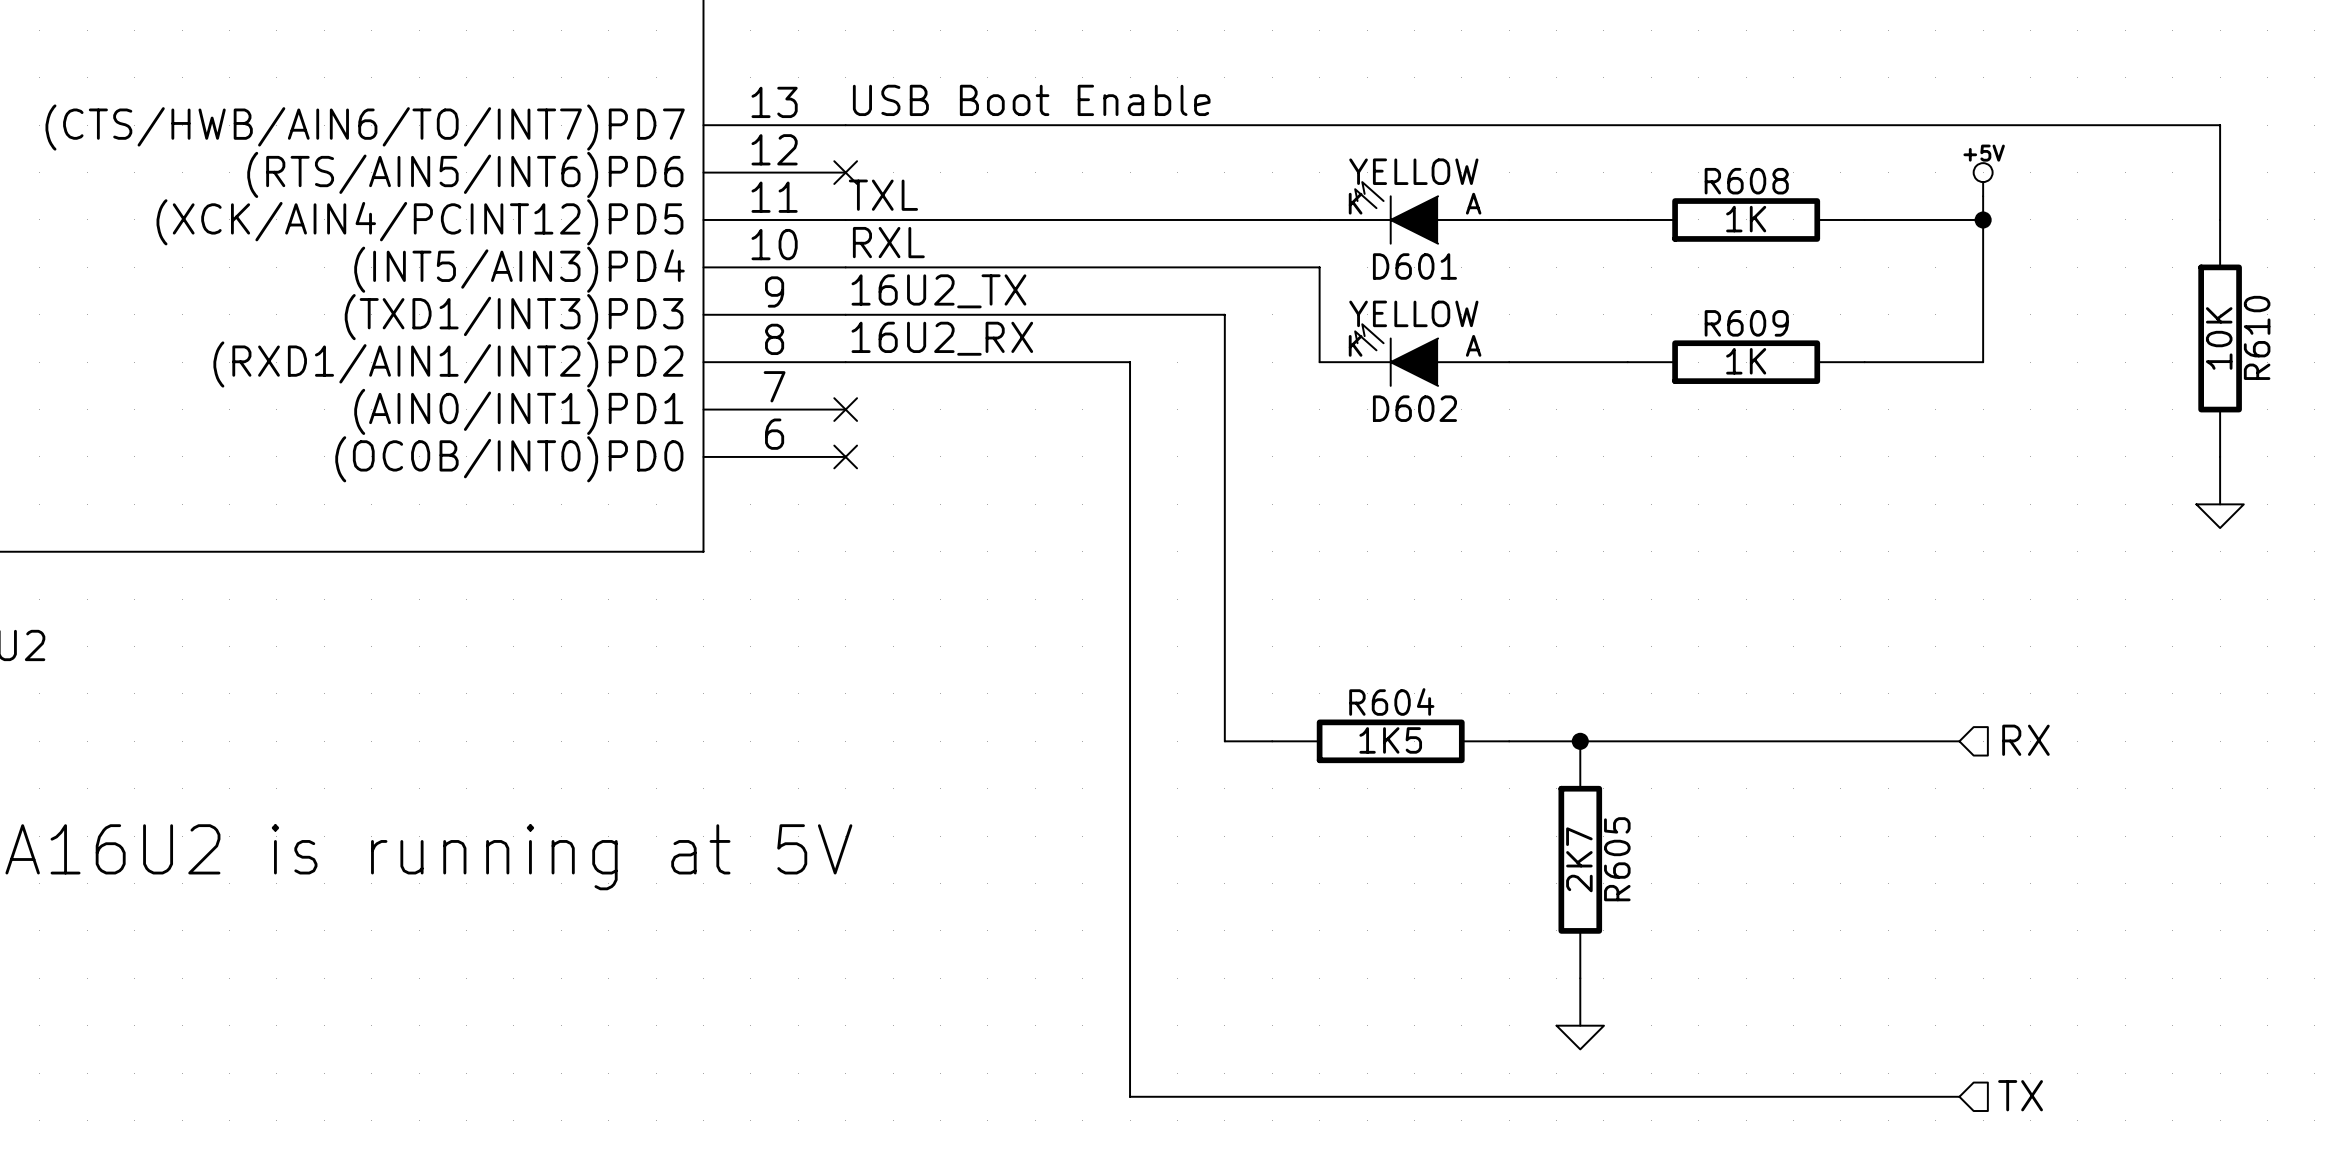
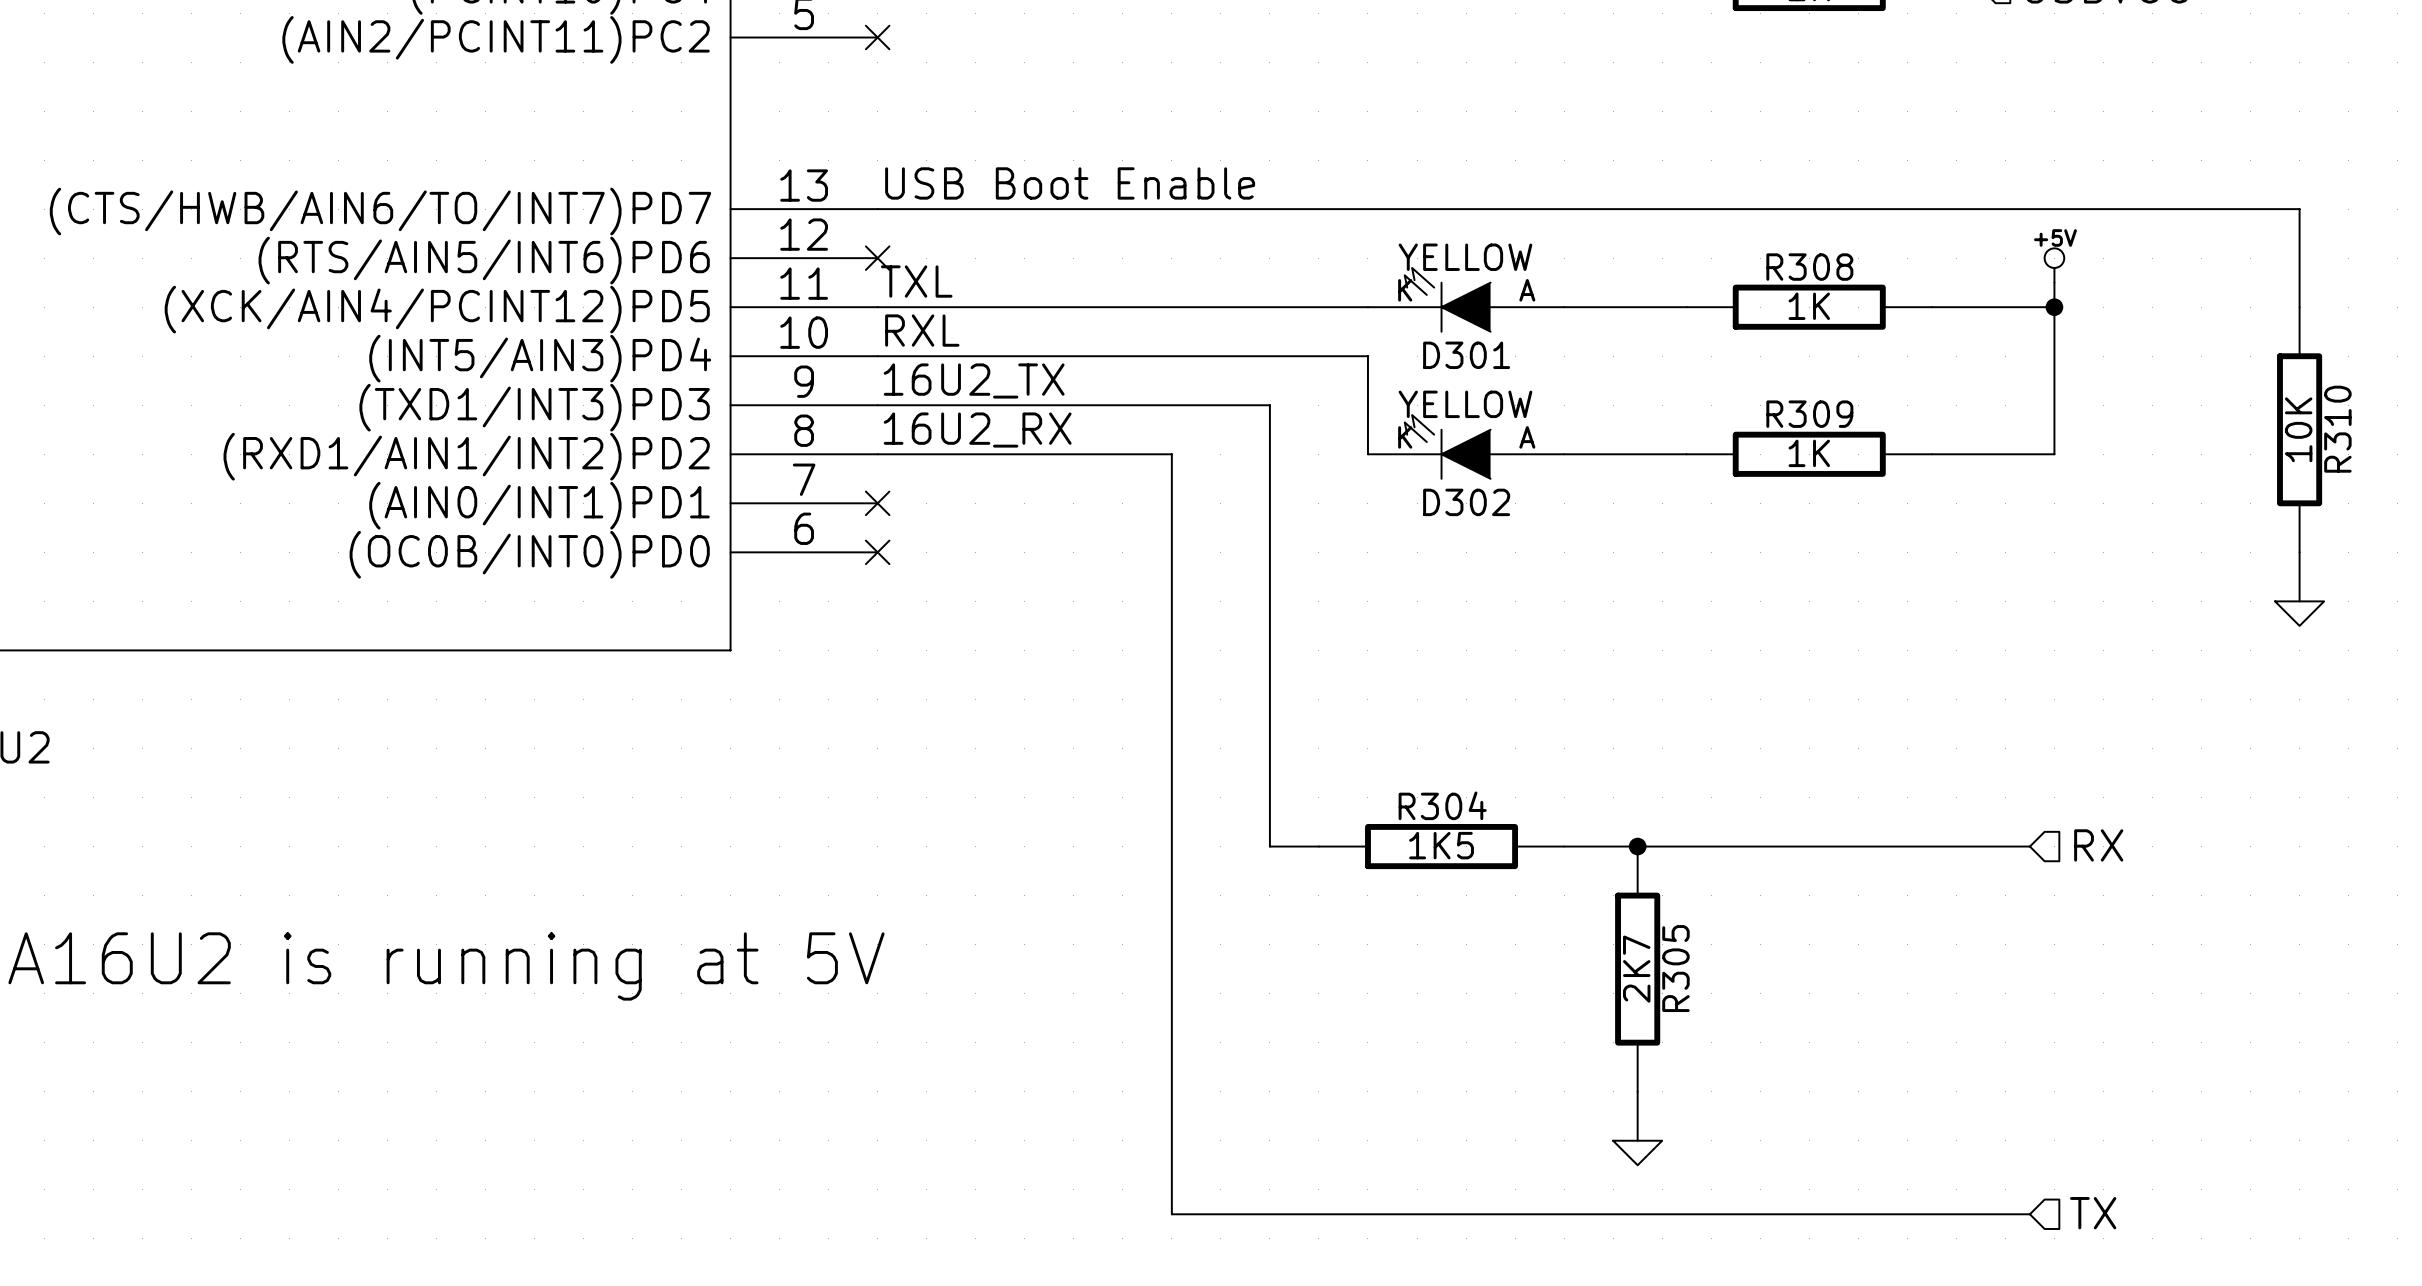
R608 name: R608 (1746, 181) -> R308 (1809, 267)
D601 name: D601 (1414, 266) -> D301 (1466, 355)
R609 name: R609 (1746, 323) -> R309 (1809, 414)
R610 name: R610 (2257, 337) -> R310 (2337, 429)
D602 name: D602 (1414, 408) -> D302 (1466, 502)
R604 name: R604 (1391, 701) -> R304 (1442, 805)
R605 name: R605 (1617, 859) -> R305 (1675, 968)

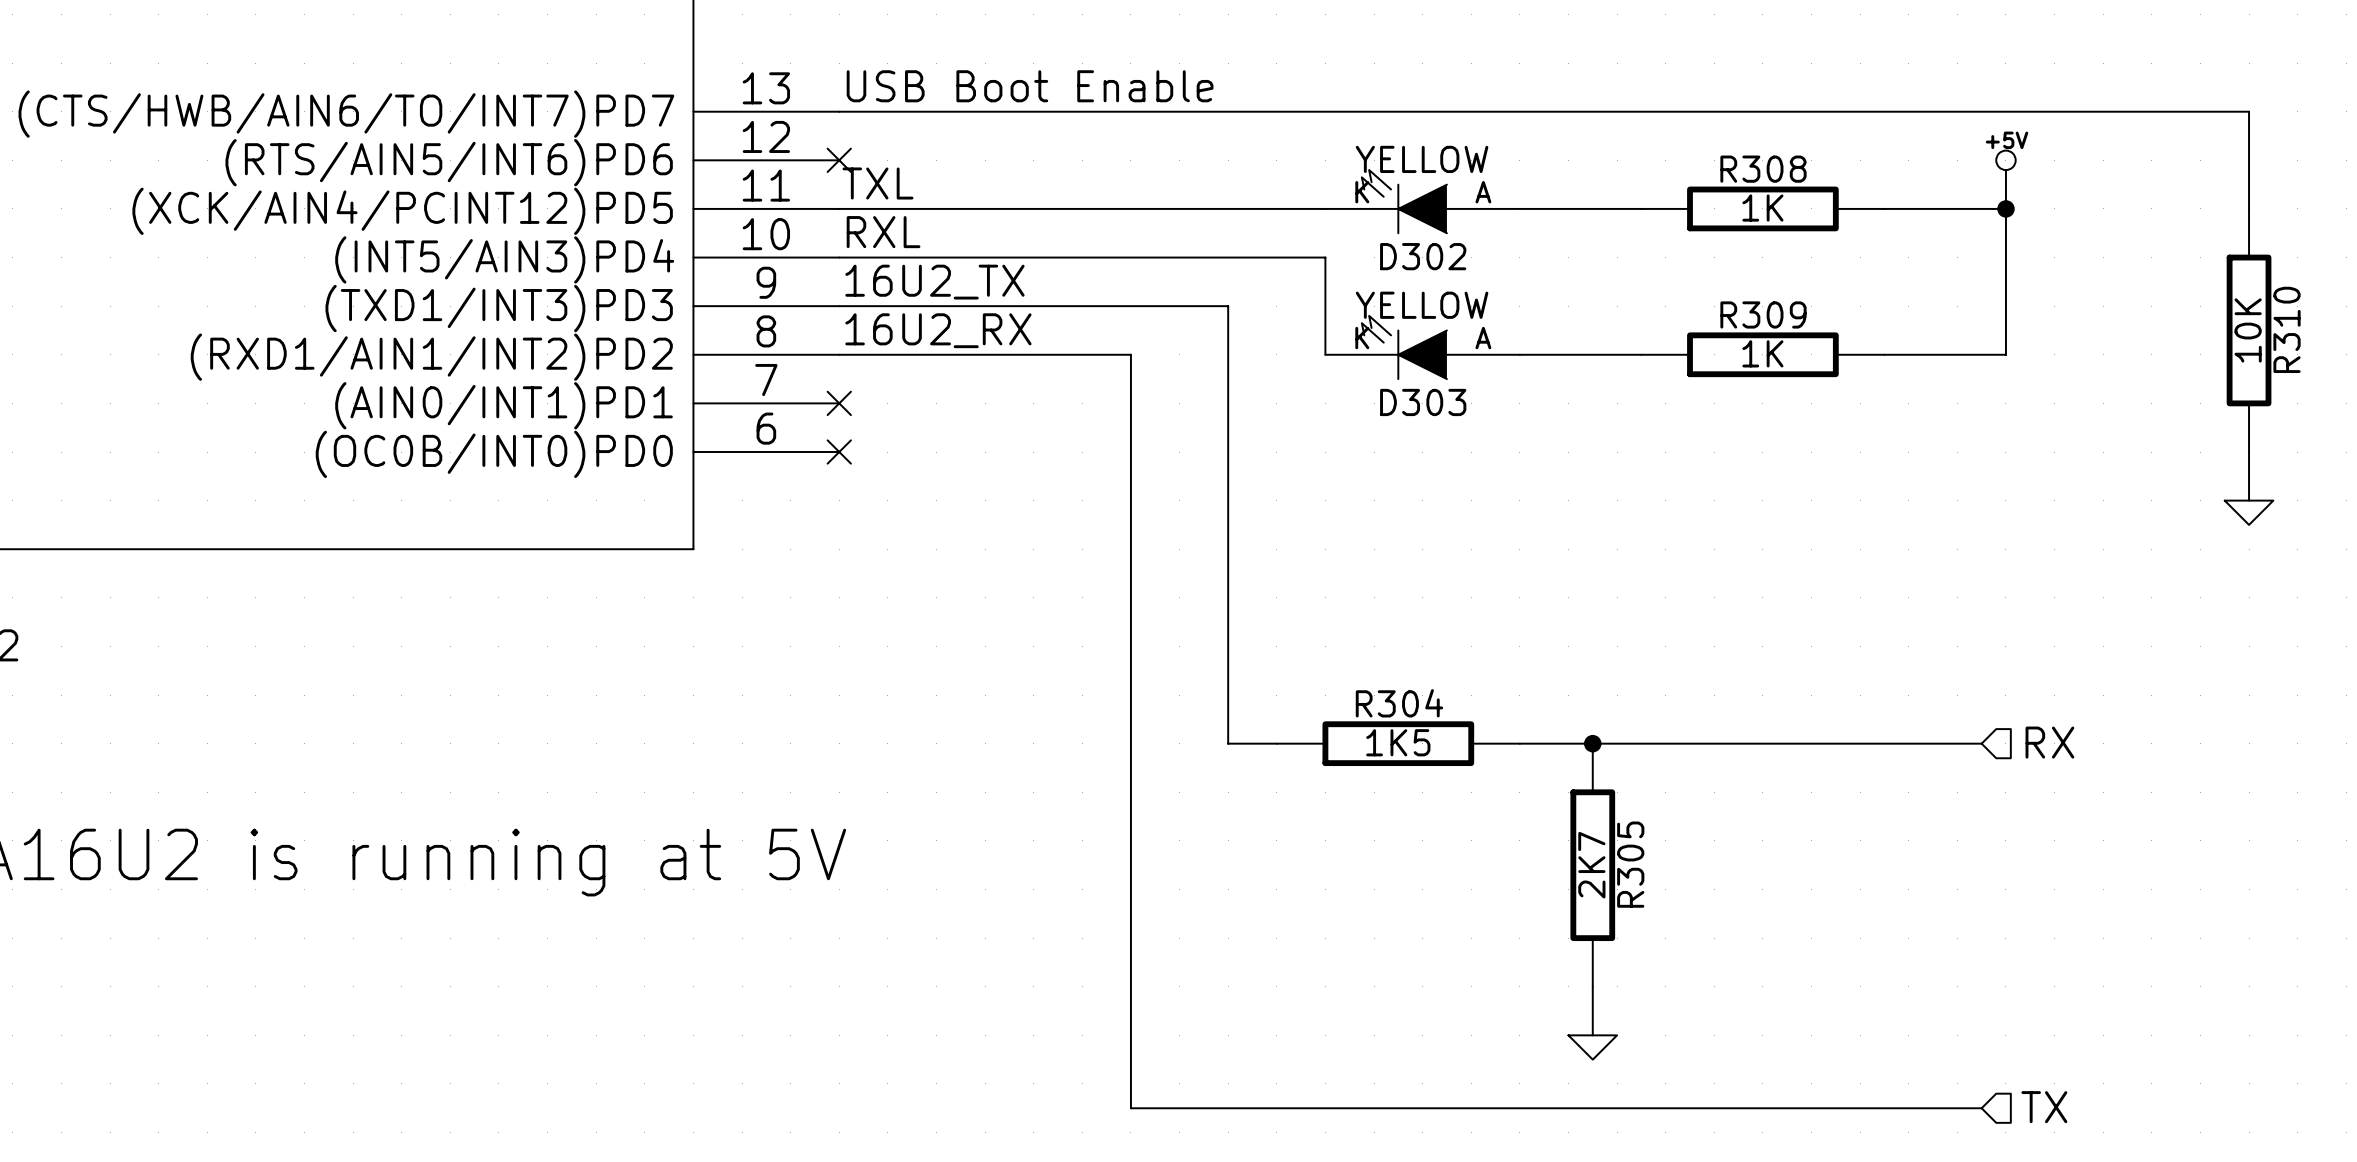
D301 name: D301 (1466, 355) -> D302 (1423, 256)
D302 name: D302 (1466, 502) -> D303 (1423, 402)

